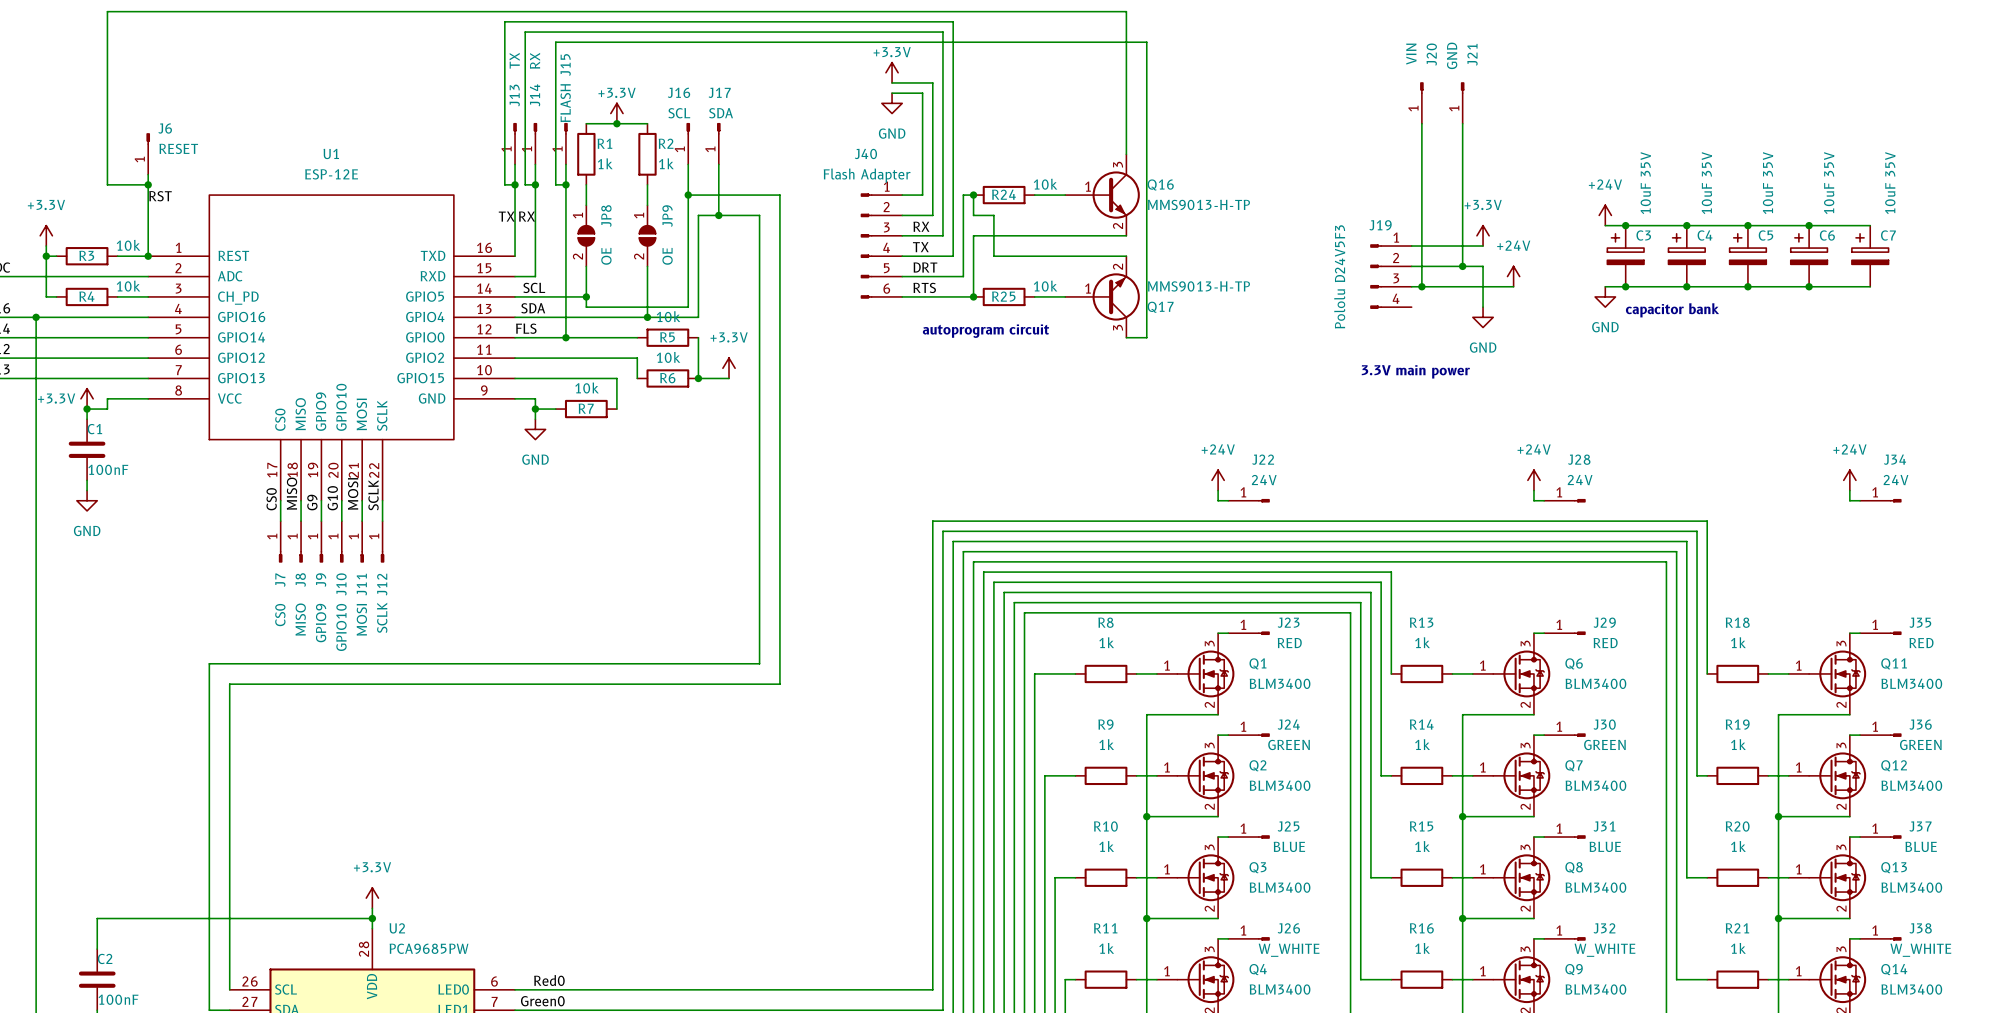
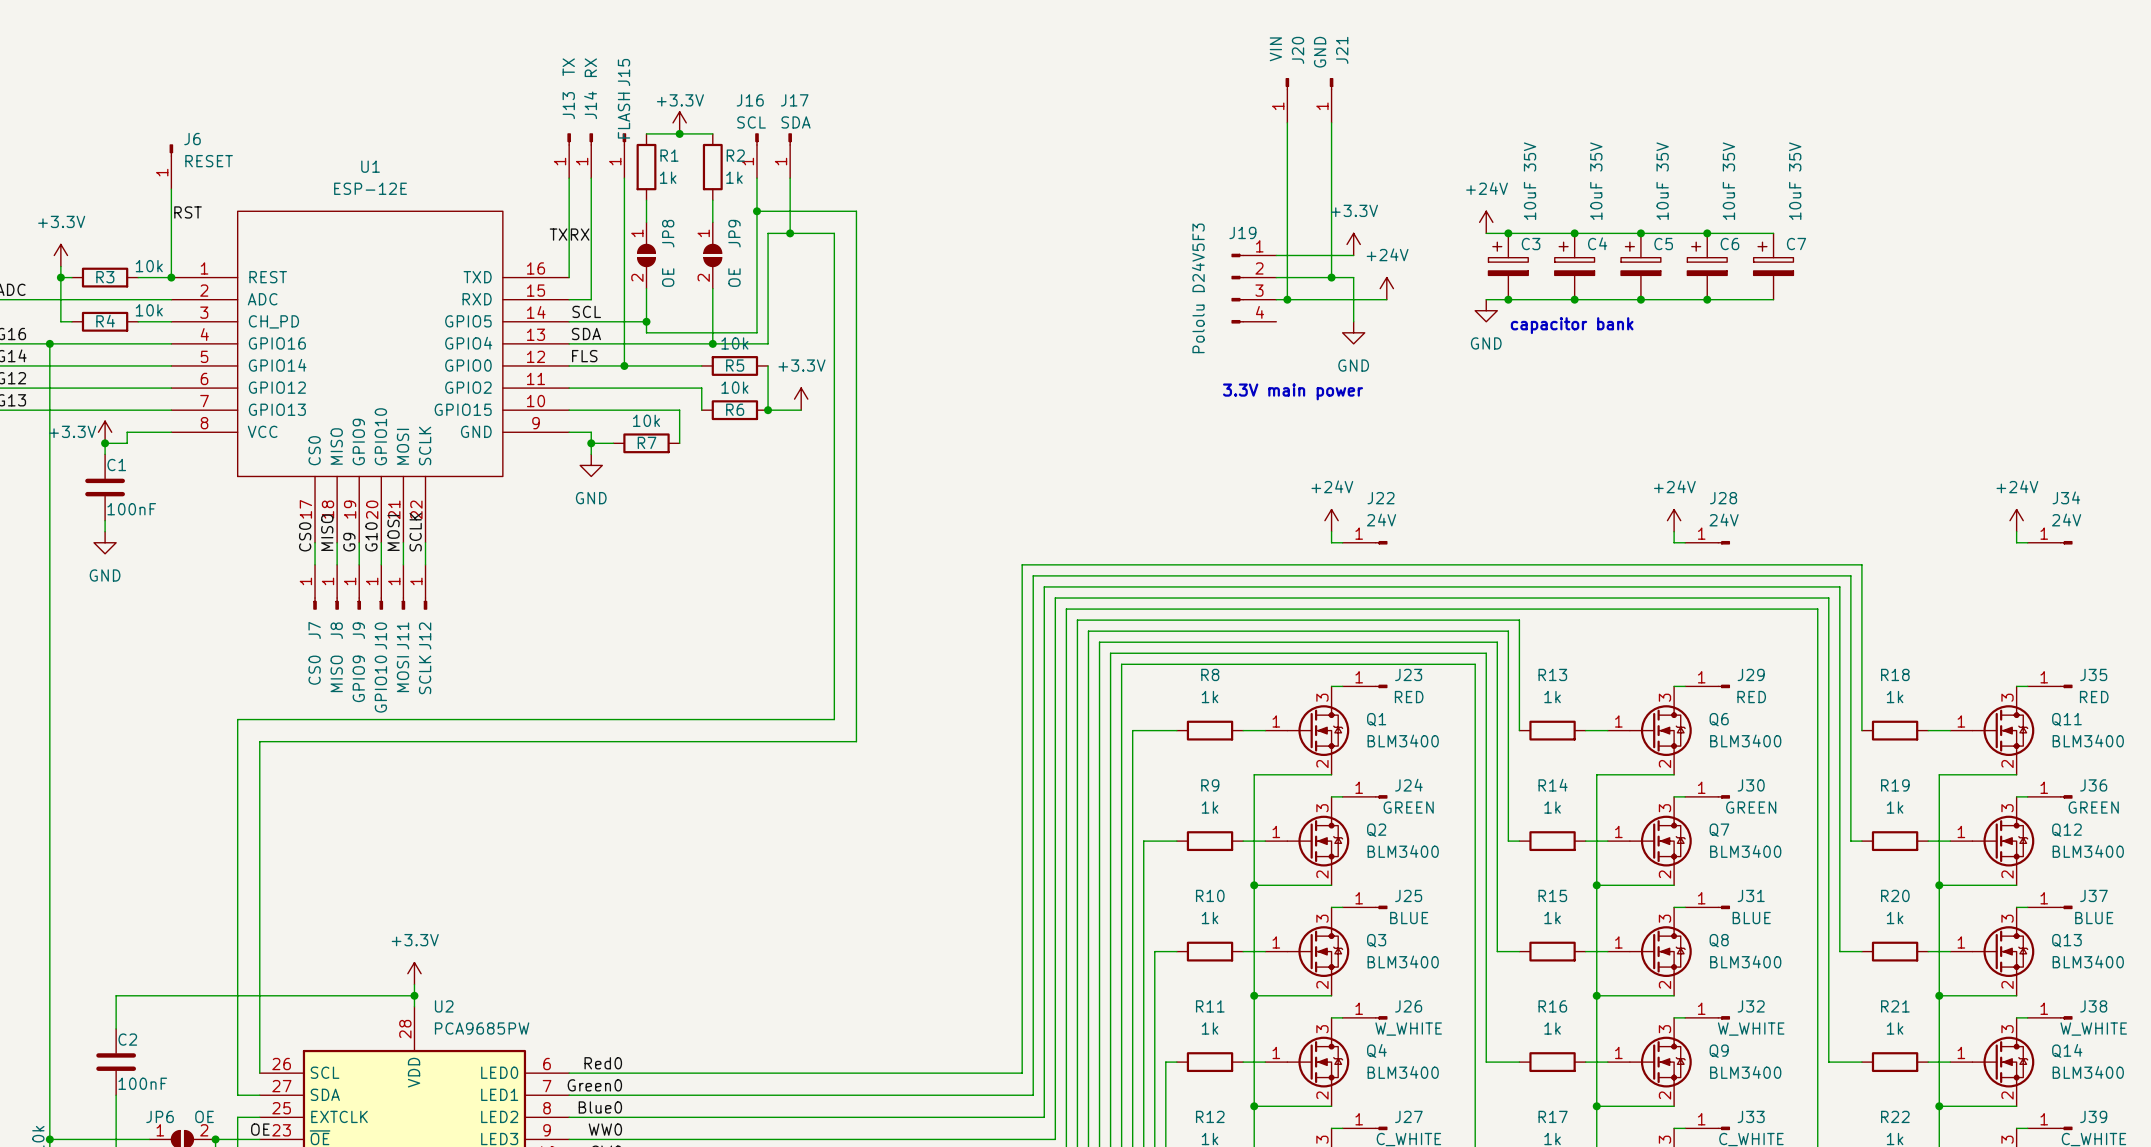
power symbol: +3.3V (892, 72) -> none
wire: (892, 82) (932, 82) (932, 215) (902, 215) -> none
wire: (892, 93) (922, 93) (922, 195) (902, 195) -> none
power symbol: GND (892, 103) -> none
J20 position: (1421, 103) -> (1287, 100)
J21 position: (1462, 103) -> (1331, 100)
wire: none -> (1287, 122) (1287, 299)
wire: none -> (1331, 122) (1331, 277)
wire: (1421, 123) (1421, 286) -> none
wire: (1462, 123) (1462, 266) -> none
wire: (1126, 154) (1126, 11) (107, 11) (107, 184) (148, 184) -> none
junction: (148, 184) -> none
wire: (515, 184) (504, 184) (504, 21) (953, 21) (953, 256) (902, 256) -> none
junction: (515, 184) -> none
wire: (535, 184) (525, 184) (525, 32) (942, 32) (942, 235) (902, 235) -> none
junction: (535, 184) -> none
wire: (565, 184) (555, 184) (555, 42) (1146, 42) (1146, 337) (1126, 337) -> none
junction: (565, 184) -> none
junction: (973, 195) -> none
R24: 10k (1004, 195) -> none
wire: (1034, 195) (1065, 195) -> none
Q16: MMS9013-H-TP (1102, 195) -> none
power symbol: none -> +24V (1486, 222)
wire: none -> (1486, 233) (1773, 233)
junction: none -> (1508, 233)
junction: none -> (1574, 233)
junction: none -> (1640, 233)
junction: none -> (1707, 233)
power symbol: +24V (1605, 215) -> none
power symbol: none -> +3.3V (1353, 244)
wire: (1605, 225) (1870, 225) -> none
junction: (1625, 225) -> none
junction: (1686, 225) -> none
junction: (1747, 225) -> none
junction: (1809, 225) -> none
label: RX (921, 226) -> none
wire: (1126, 235) (973, 235) (973, 296) (902, 296) -> none
wire: none -> (1276, 255) (1353, 255)
power symbol: +3.3V (1483, 235) -> none
J40: Flash Adapter (881, 246) -> none
wire: (1411, 246) (1483, 246) -> none
label: TX (920, 247) -> none
wire: (1126, 256) (993, 256) (993, 215) (973, 215) (973, 195) (963, 195) (963, 276) (902, 276) -> none
wire: none -> (1276, 277) (1353, 277) (1353, 321)
junction: none -> (1331, 277)
C3 position: (1625, 256) -> (1508, 266)
C4 position: (1686, 256) -> (1574, 266)
C5 position: (1747, 256) -> (1640, 266)
C6 position: (1809, 256) -> (1707, 266)
C7 position: (1870, 256) -> (1773, 266)
power symbol: none -> +24V (1386, 288)
wire: (1411, 266) (1483, 266) (1483, 307) -> none
junction: (1462, 266) -> none
label: DRT (925, 267) -> none
wire: none -> (1276, 299) (1386, 299)
junction: none -> (1287, 299)
wire: none -> (1486, 299) (1773, 299)
junction: none -> (1508, 299)
J19 position: (1391, 276) -> (1253, 288)
junction: none -> (1574, 299)
junction: none -> (1640, 299)
power symbol: +24V (1513, 276) -> none
junction: none -> (1707, 299)
power symbol: none -> GND (1486, 310)
wire: (1411, 286) (1513, 286) -> none
junction: (1421, 286) -> none
wire: (1605, 286) (1870, 286) -> none
junction: (1625, 286) -> none
junction: (1686, 286) -> none
junction: (1747, 286) -> none
junction: (1809, 286) -> none
label: RTS (924, 287) -> none
junction: (973, 296) -> none
R25: 10k (1004, 296) -> none
wire: (1034, 296) (1065, 296) -> none
Q17: MMS9013-H-TP (1102, 296) -> none
power symbol: GND (1605, 296) -> none
text: none -> capacitor bank (1572, 325)
power symbol: none -> GND (1353, 332)
text: capacitor bank (1672, 310) -> none
power symbol: GND (1483, 317) -> none
text: autoprogram circuit (985, 331) -> none
text: none -> 3.3V main power (1293, 391)
text: 3.3V main power (1415, 371) -> none

